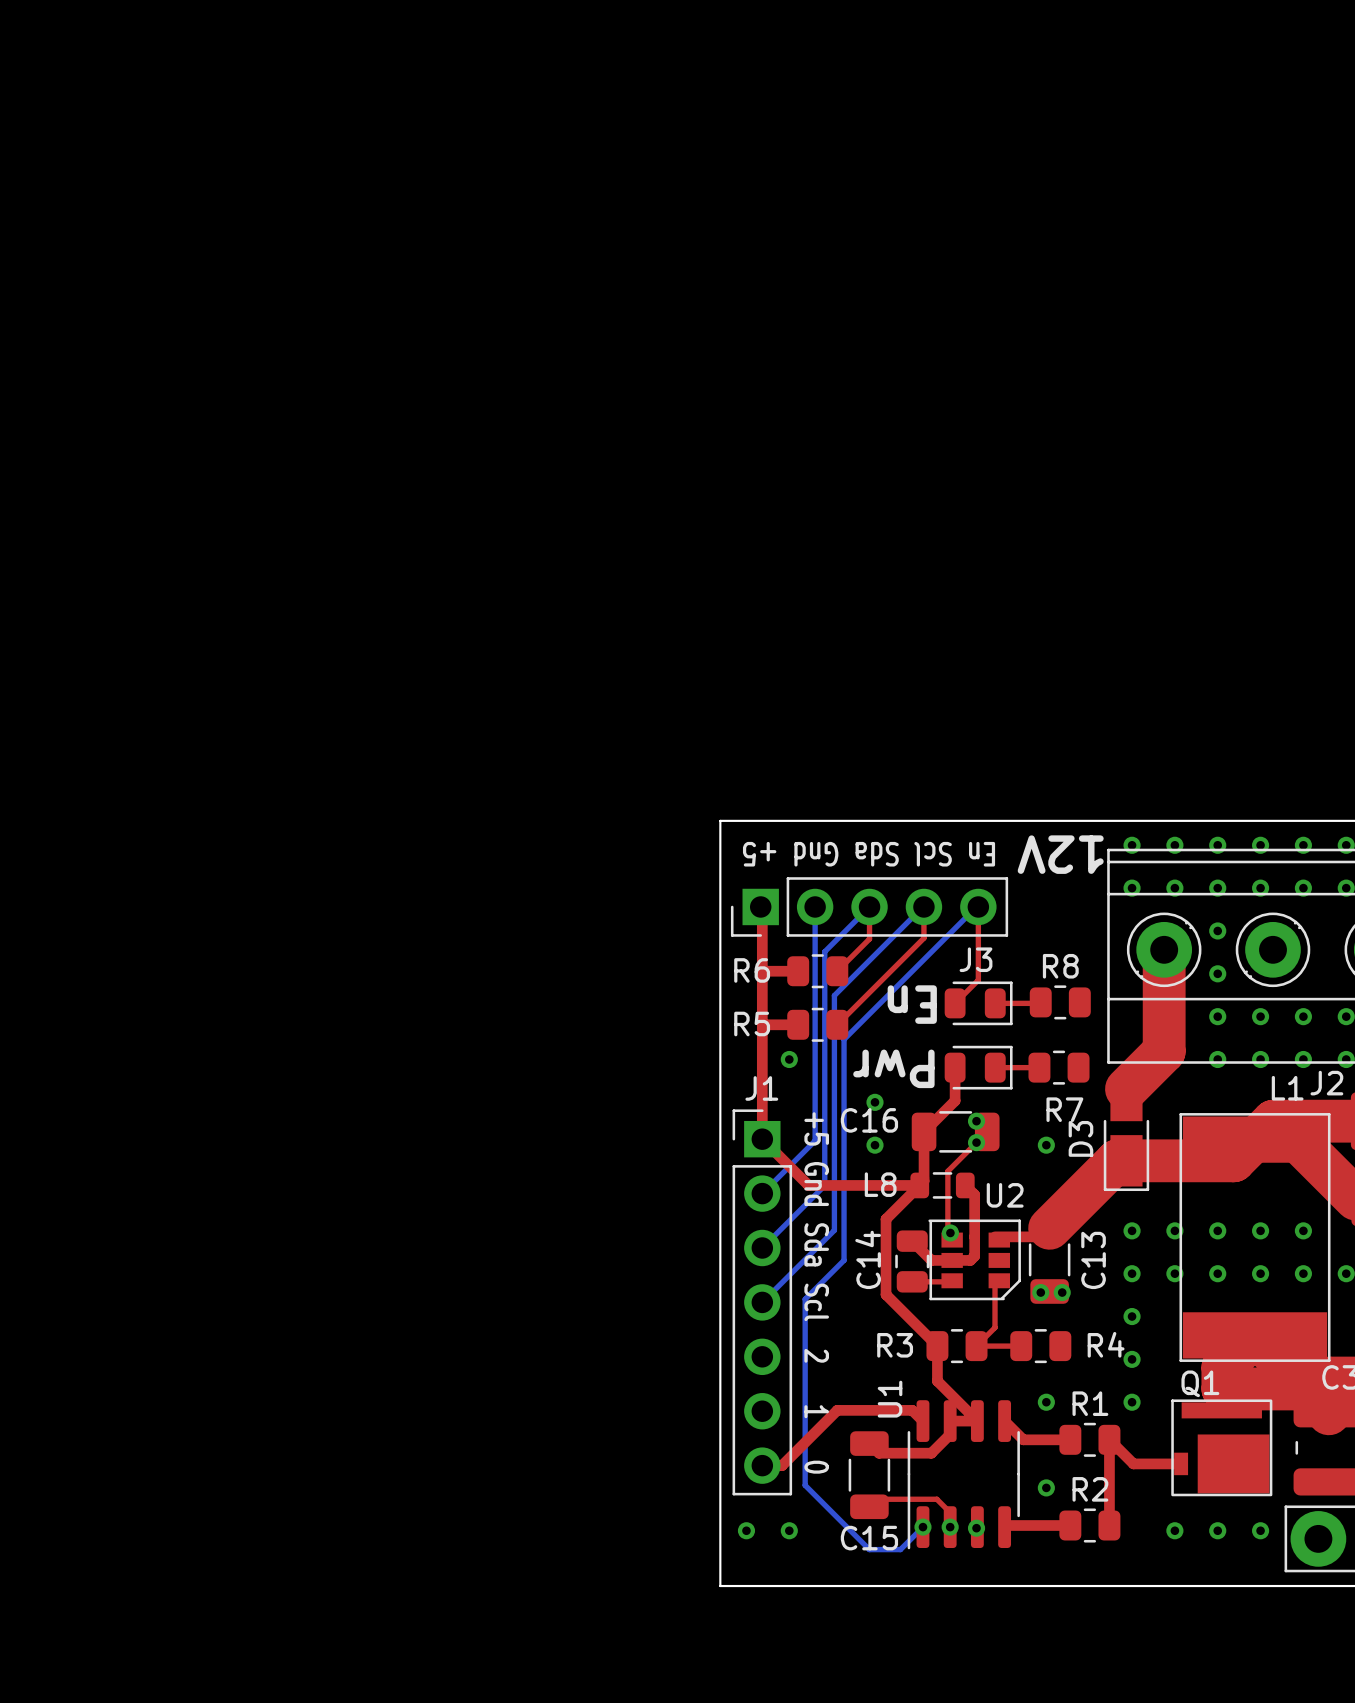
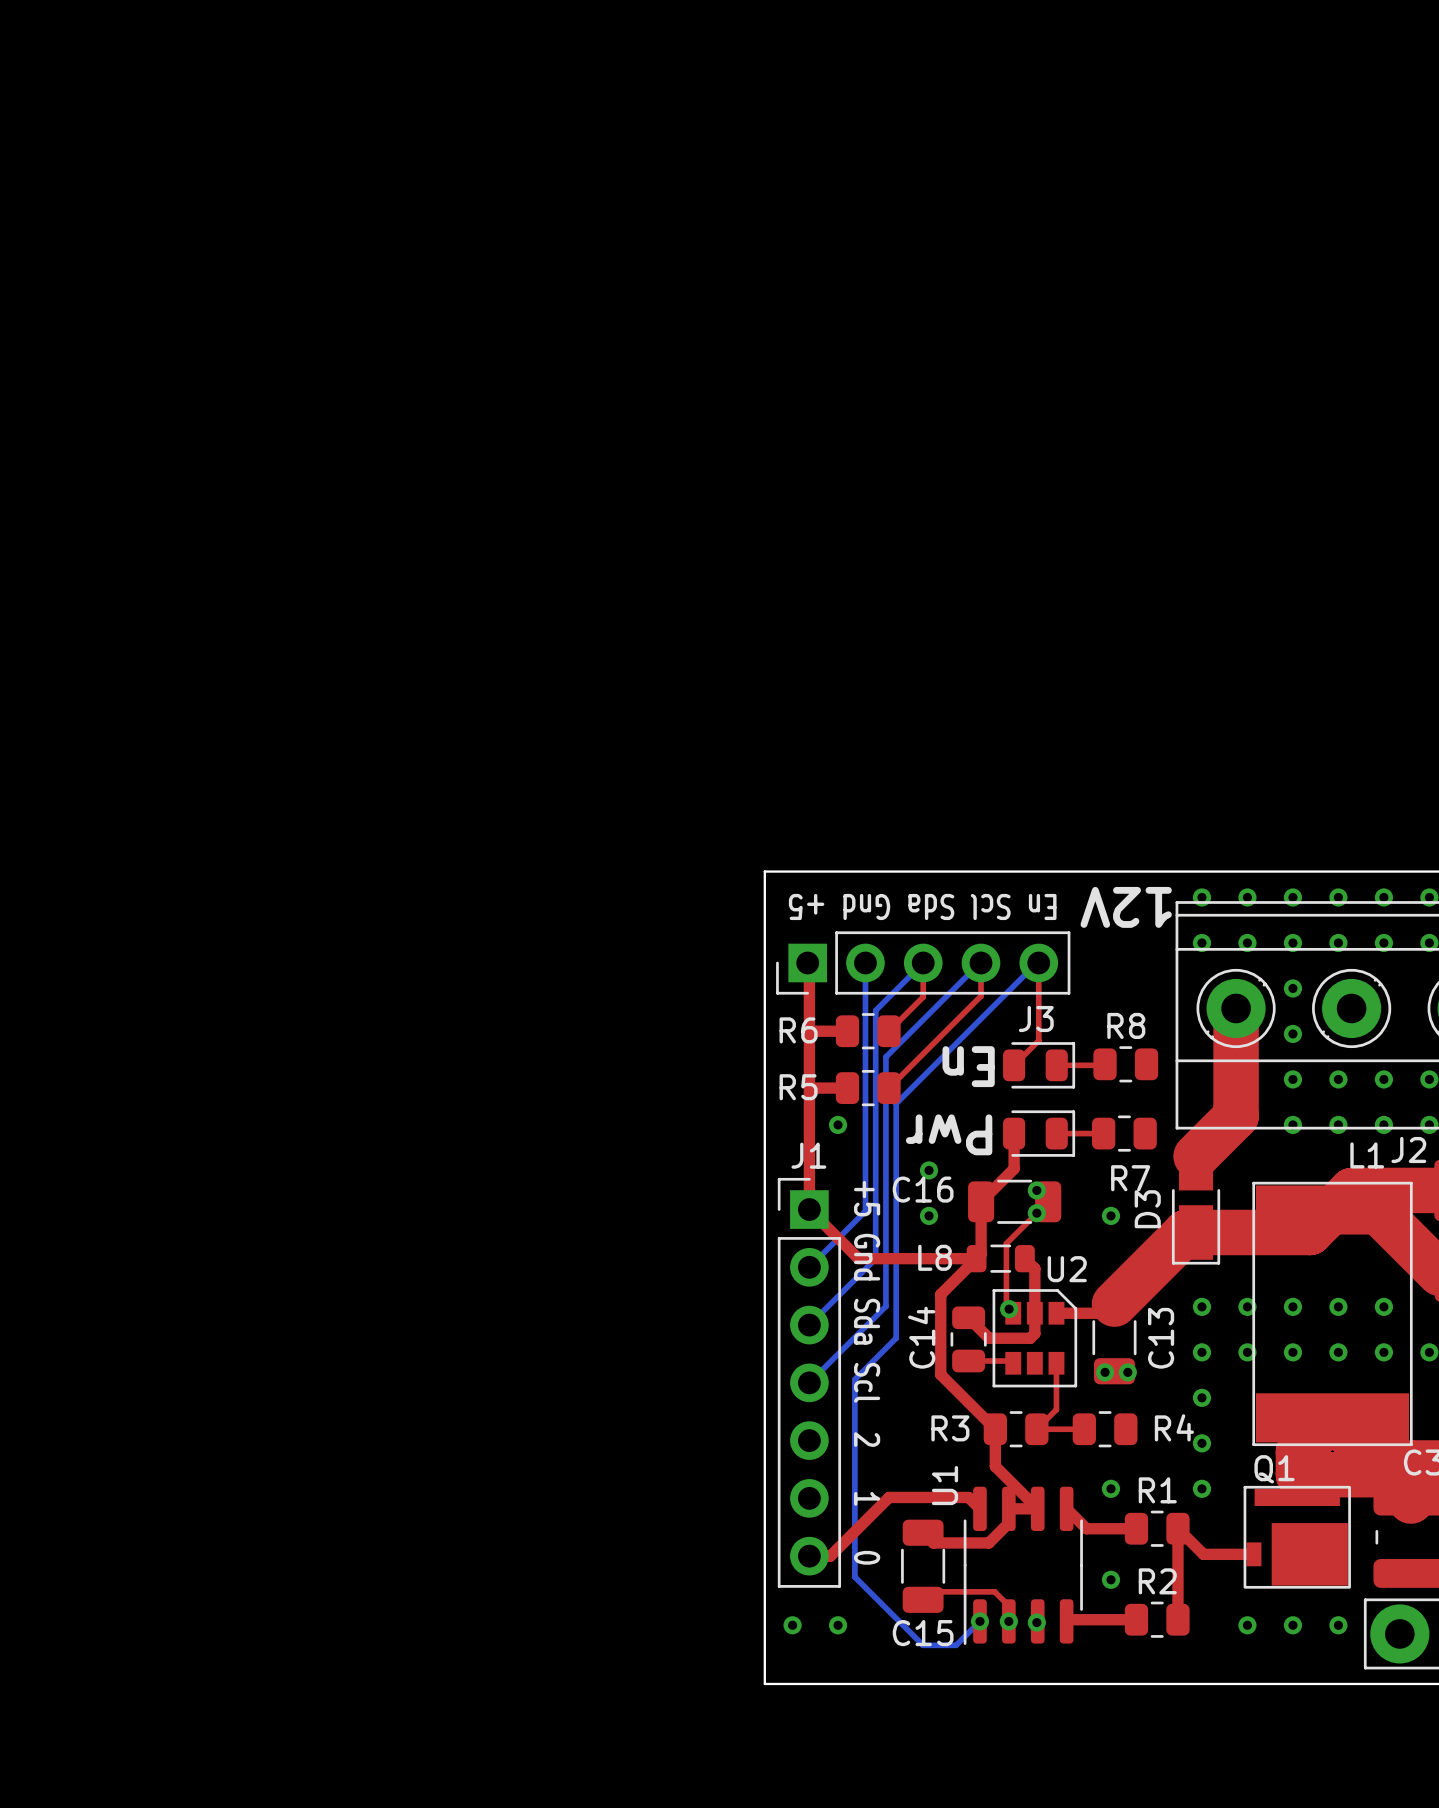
U2 footprint: [928, 1219, 1021, 1301] -> [992, 1289, 1078, 1388]

